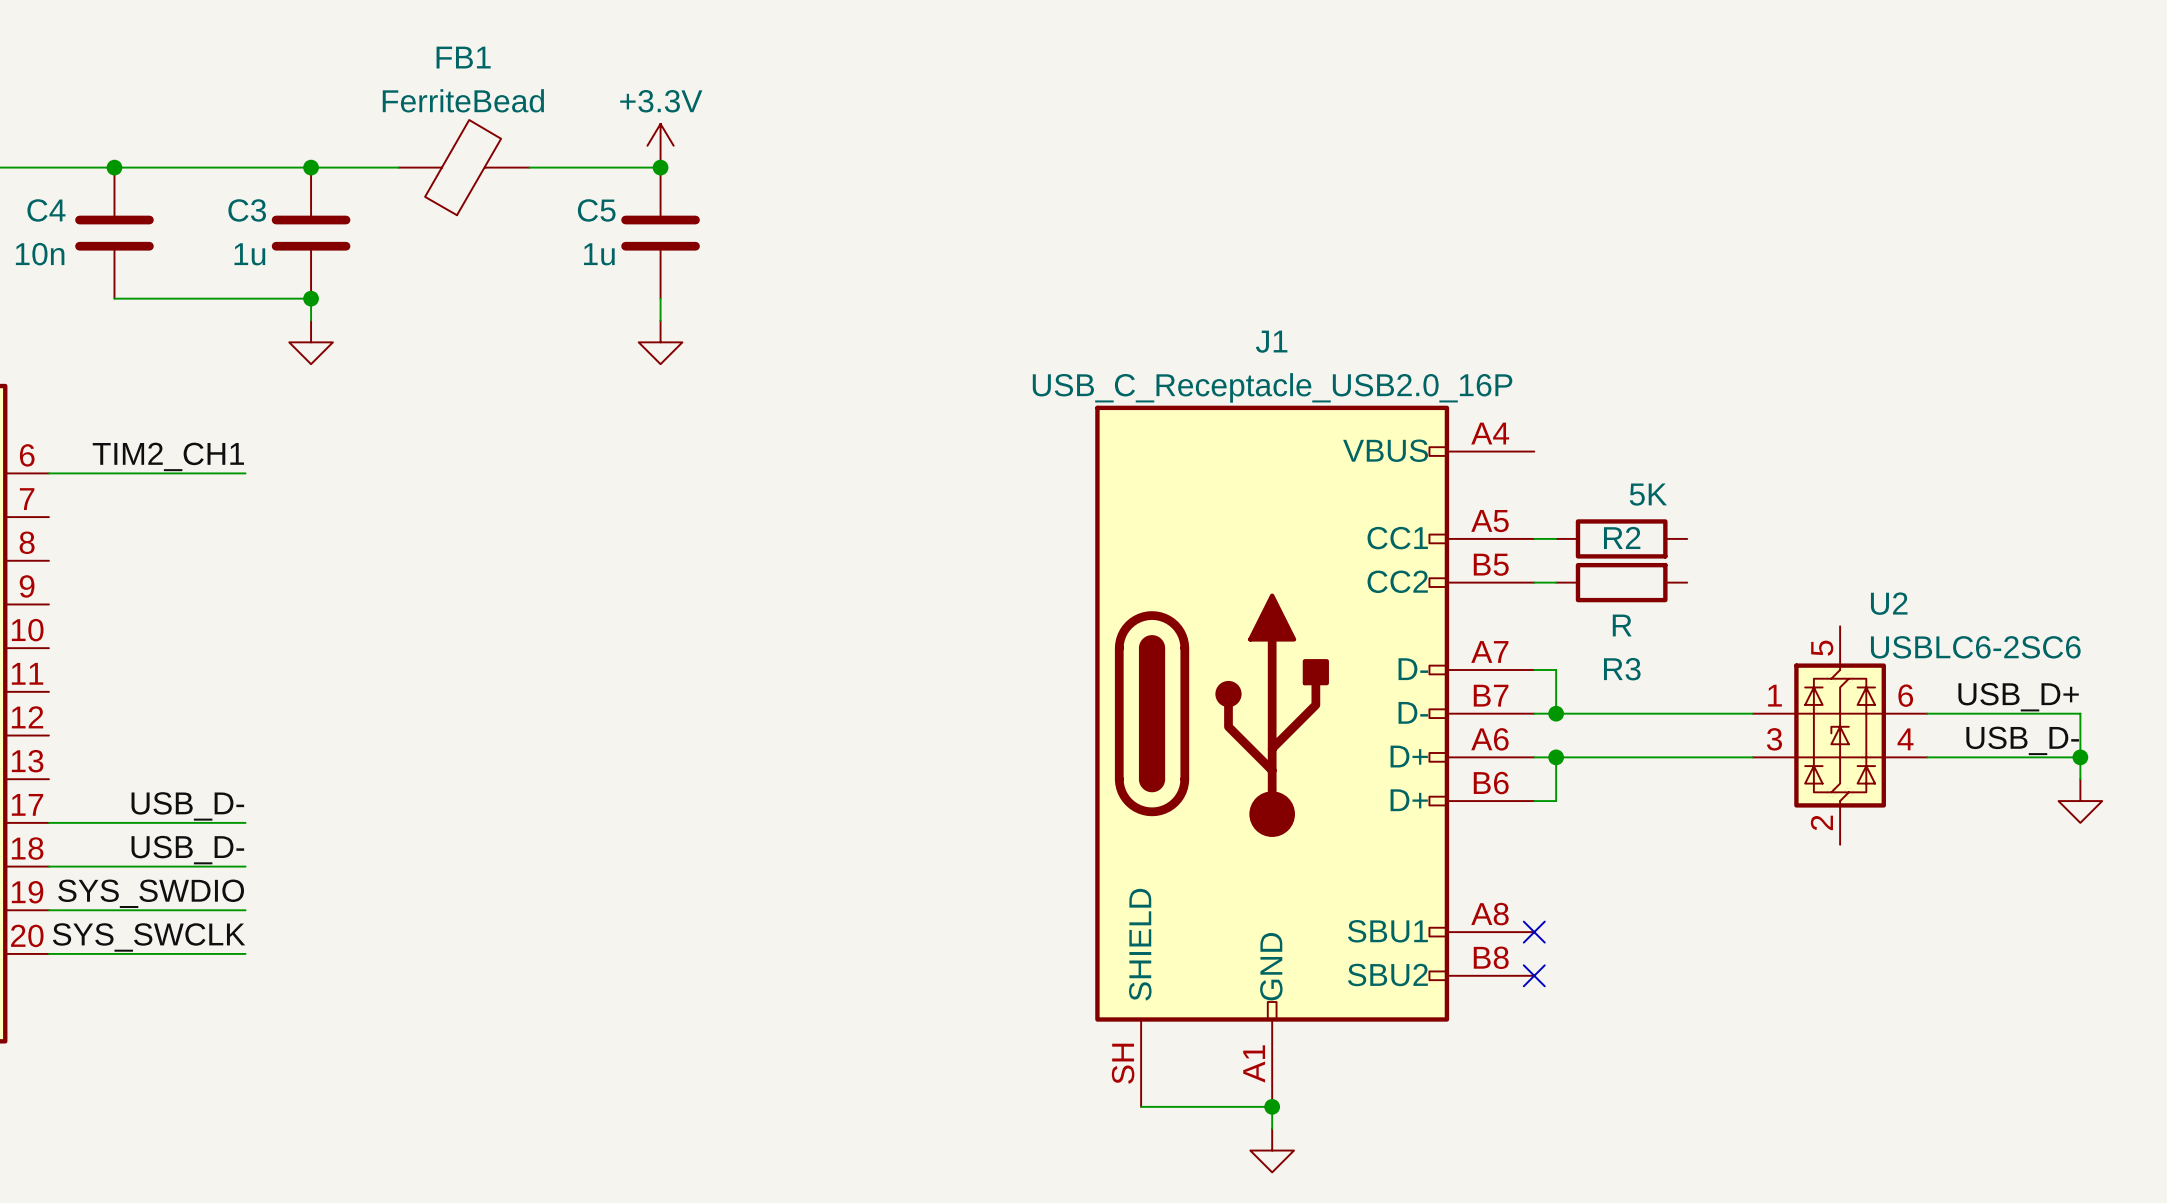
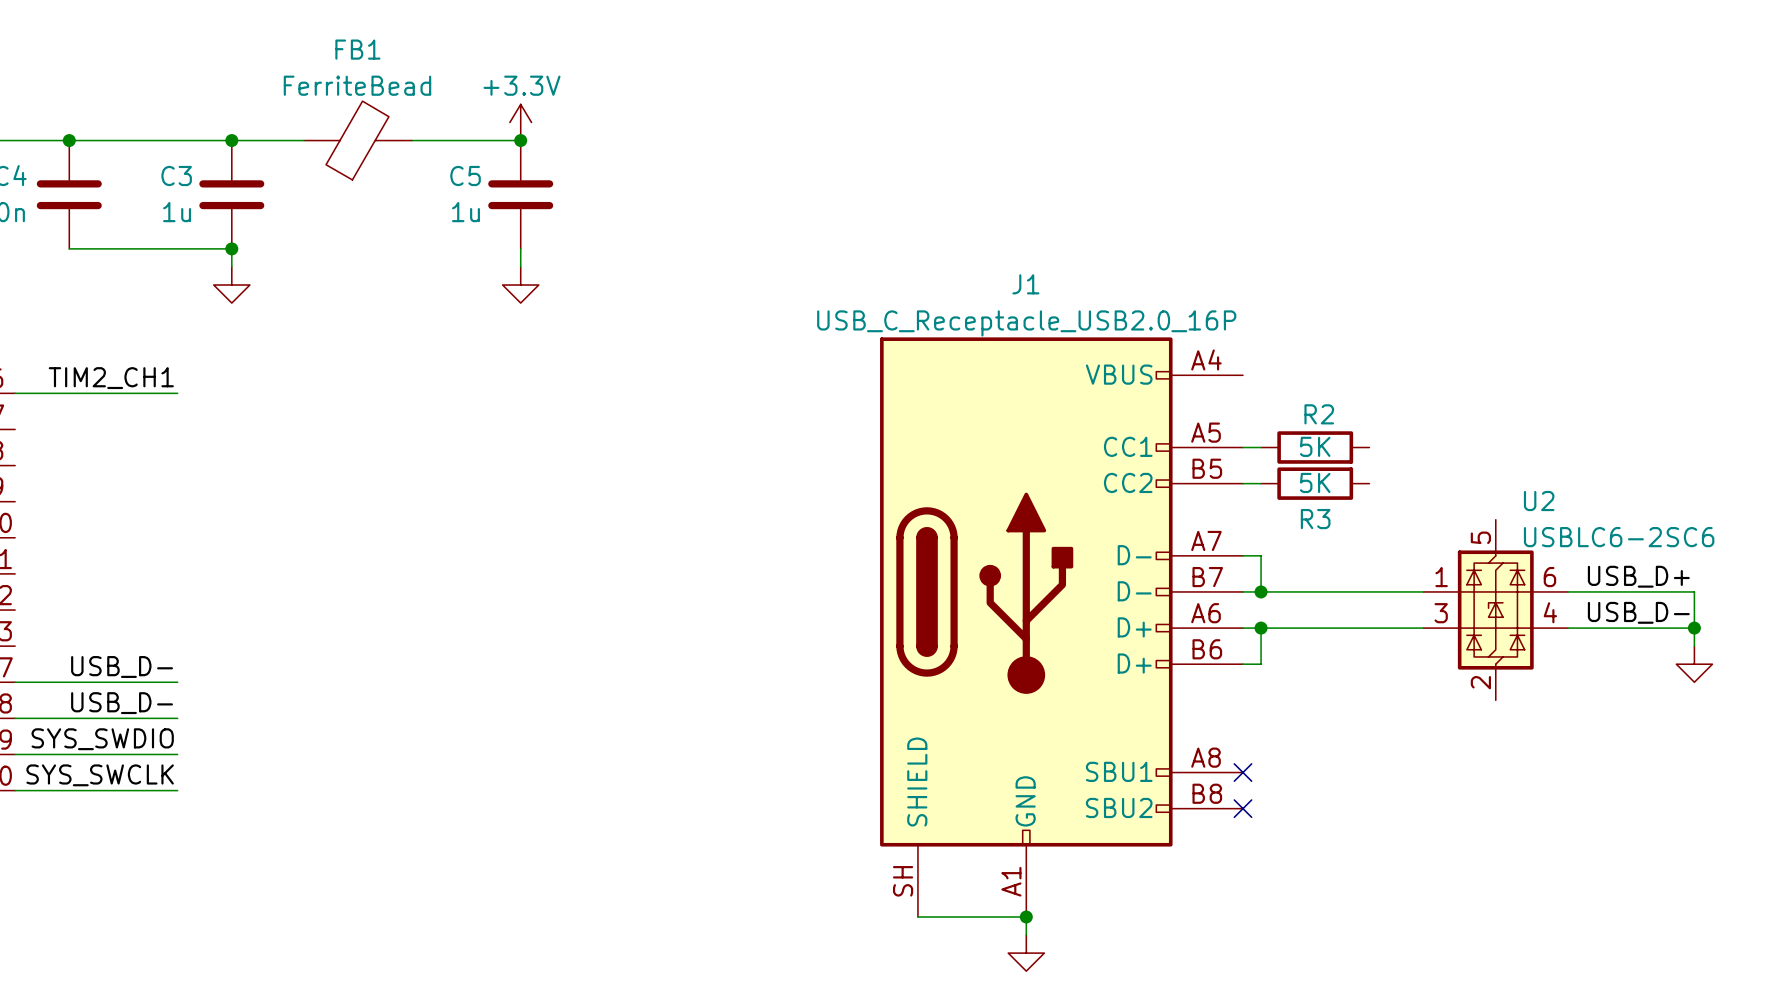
R2 value position: 5K (1648, 494) -> 5K (1315, 446)
R2 name position: R2 (1622, 537) -> R2 (1319, 414)
R3 value: R (1622, 625) -> 5K (1315, 482)
R3 name position: R3 (1622, 669) -> R3 (1315, 519)

